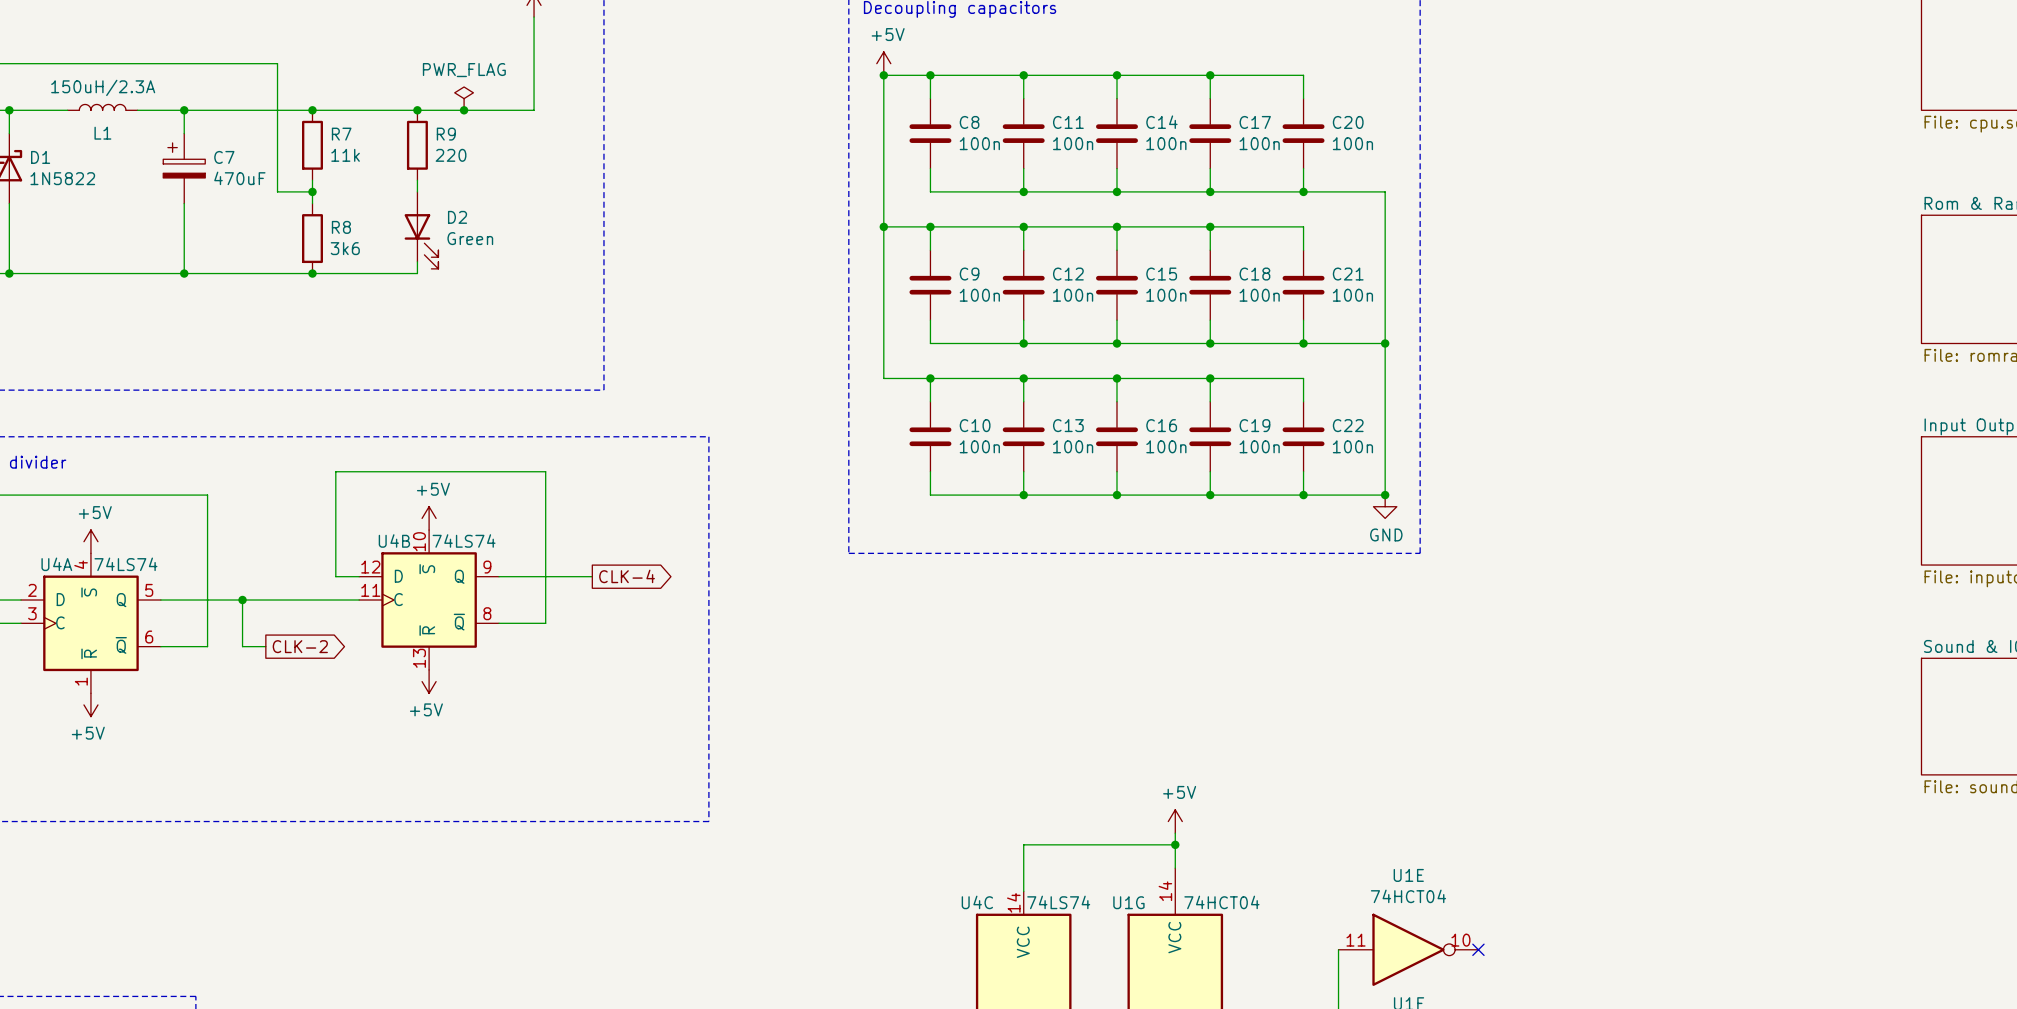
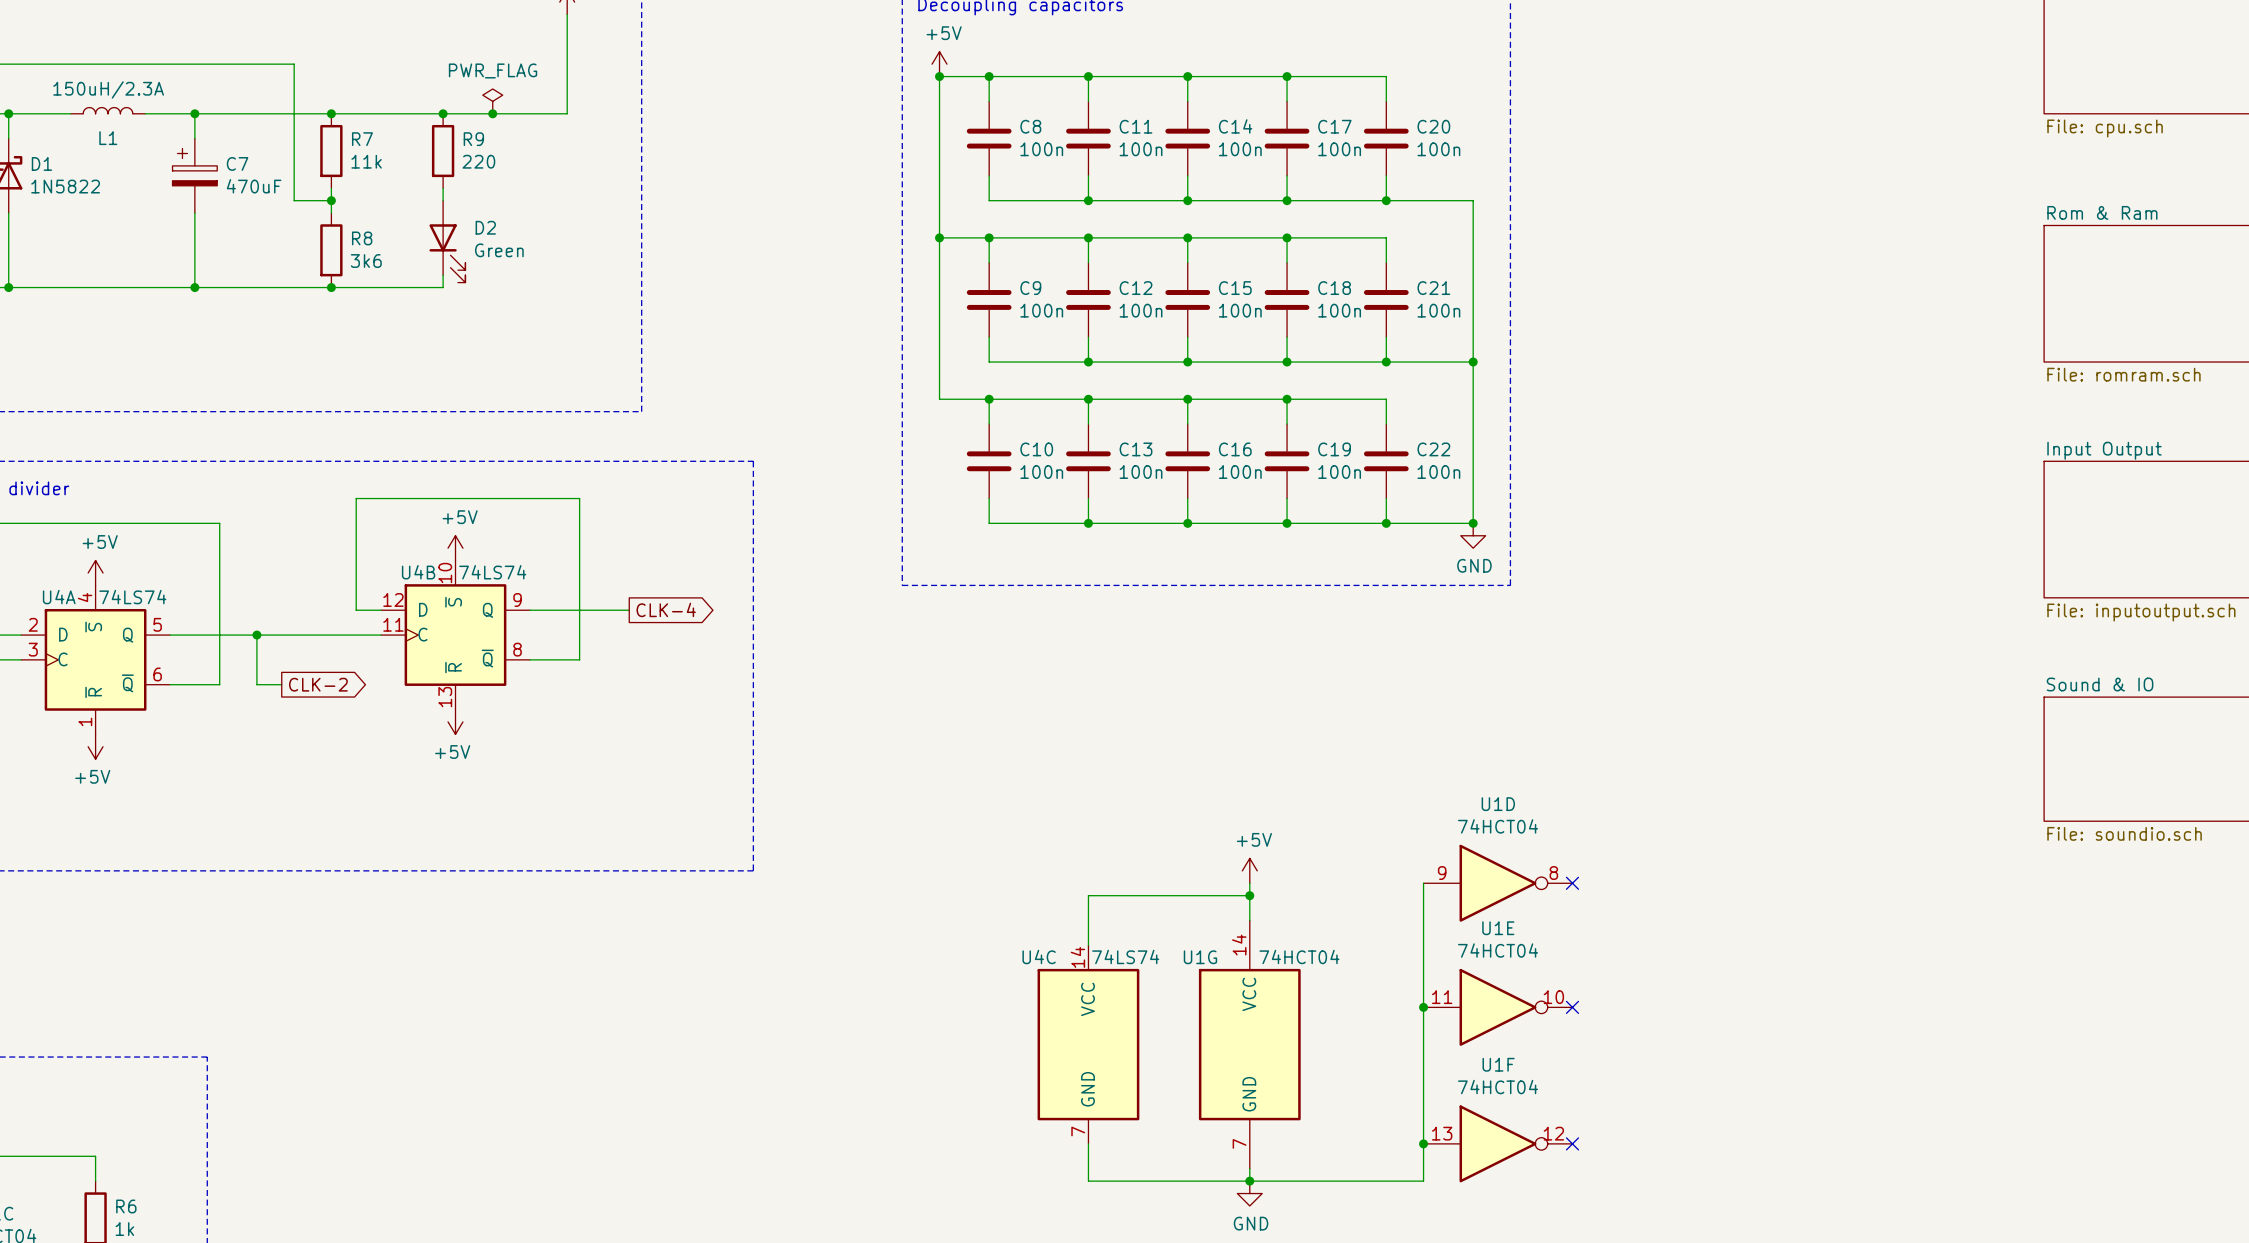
wire: none -> (1423, 883) (1423, 1007)
U1D: none -> 74HCT04 (1498, 883)
no-connect mark: none -> (1572, 883)
junction: none -> (1423, 1007)

